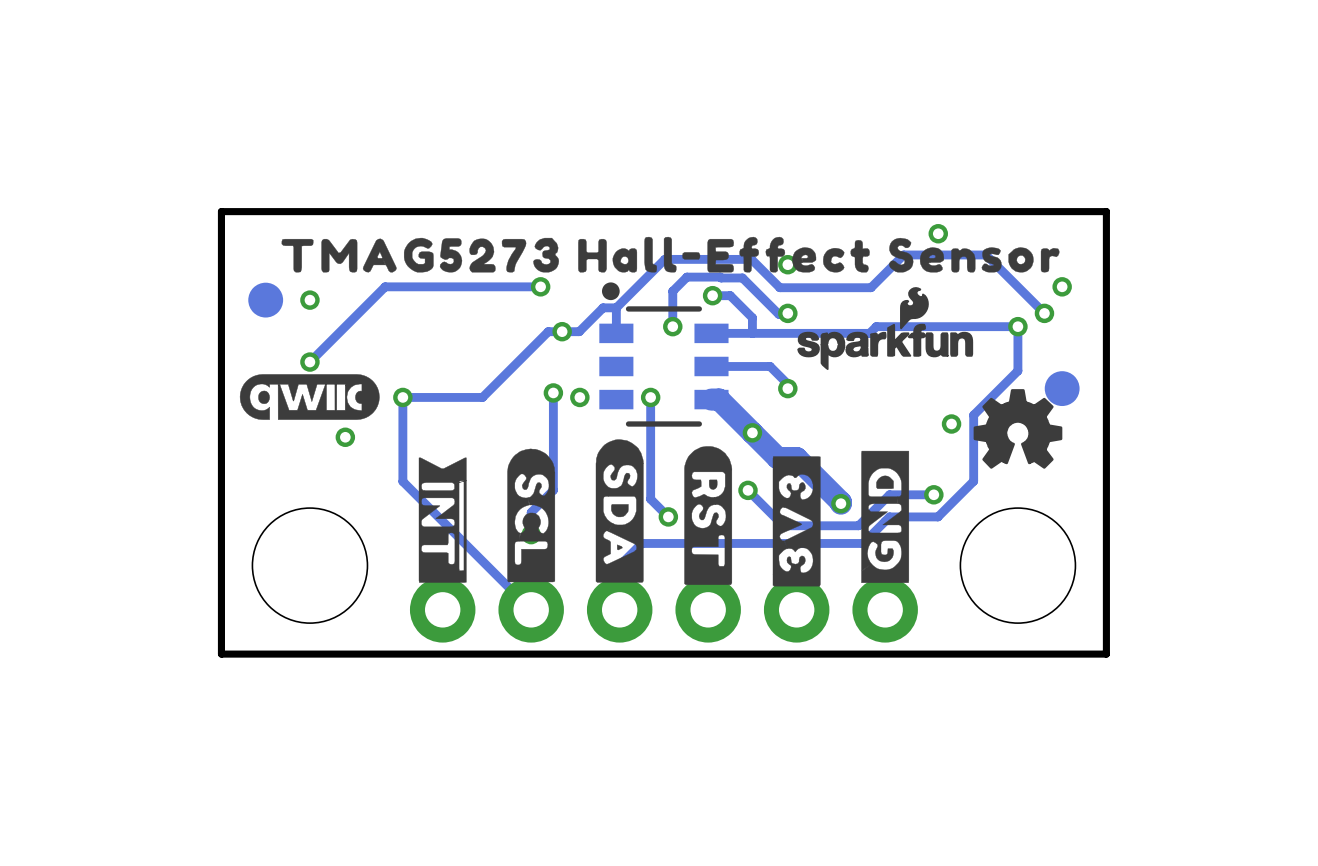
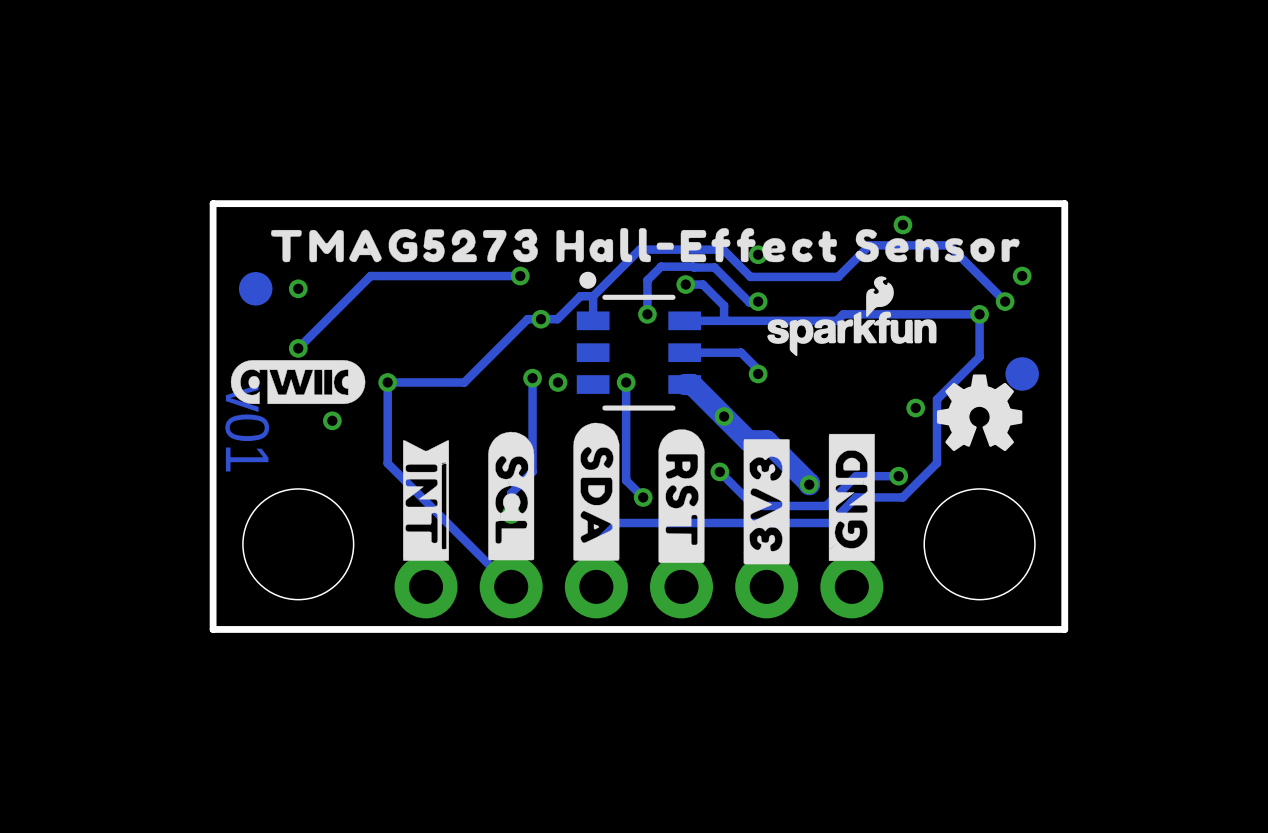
text: none -> v01 (247, 428)

